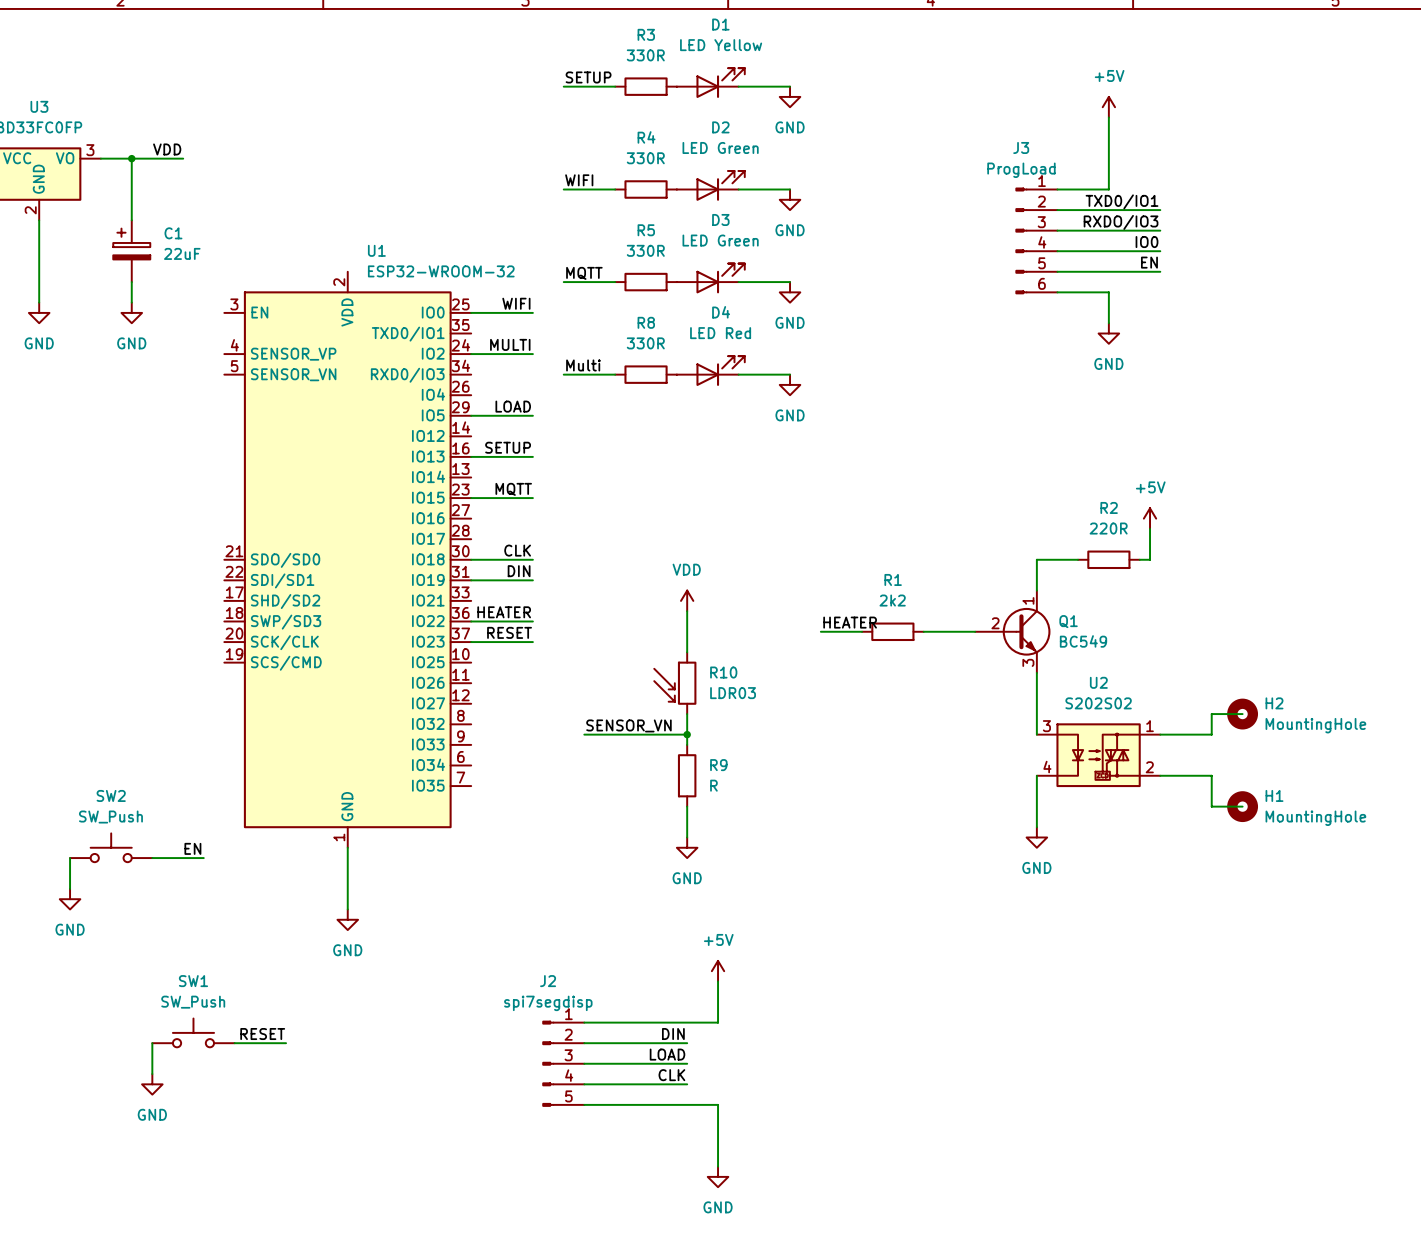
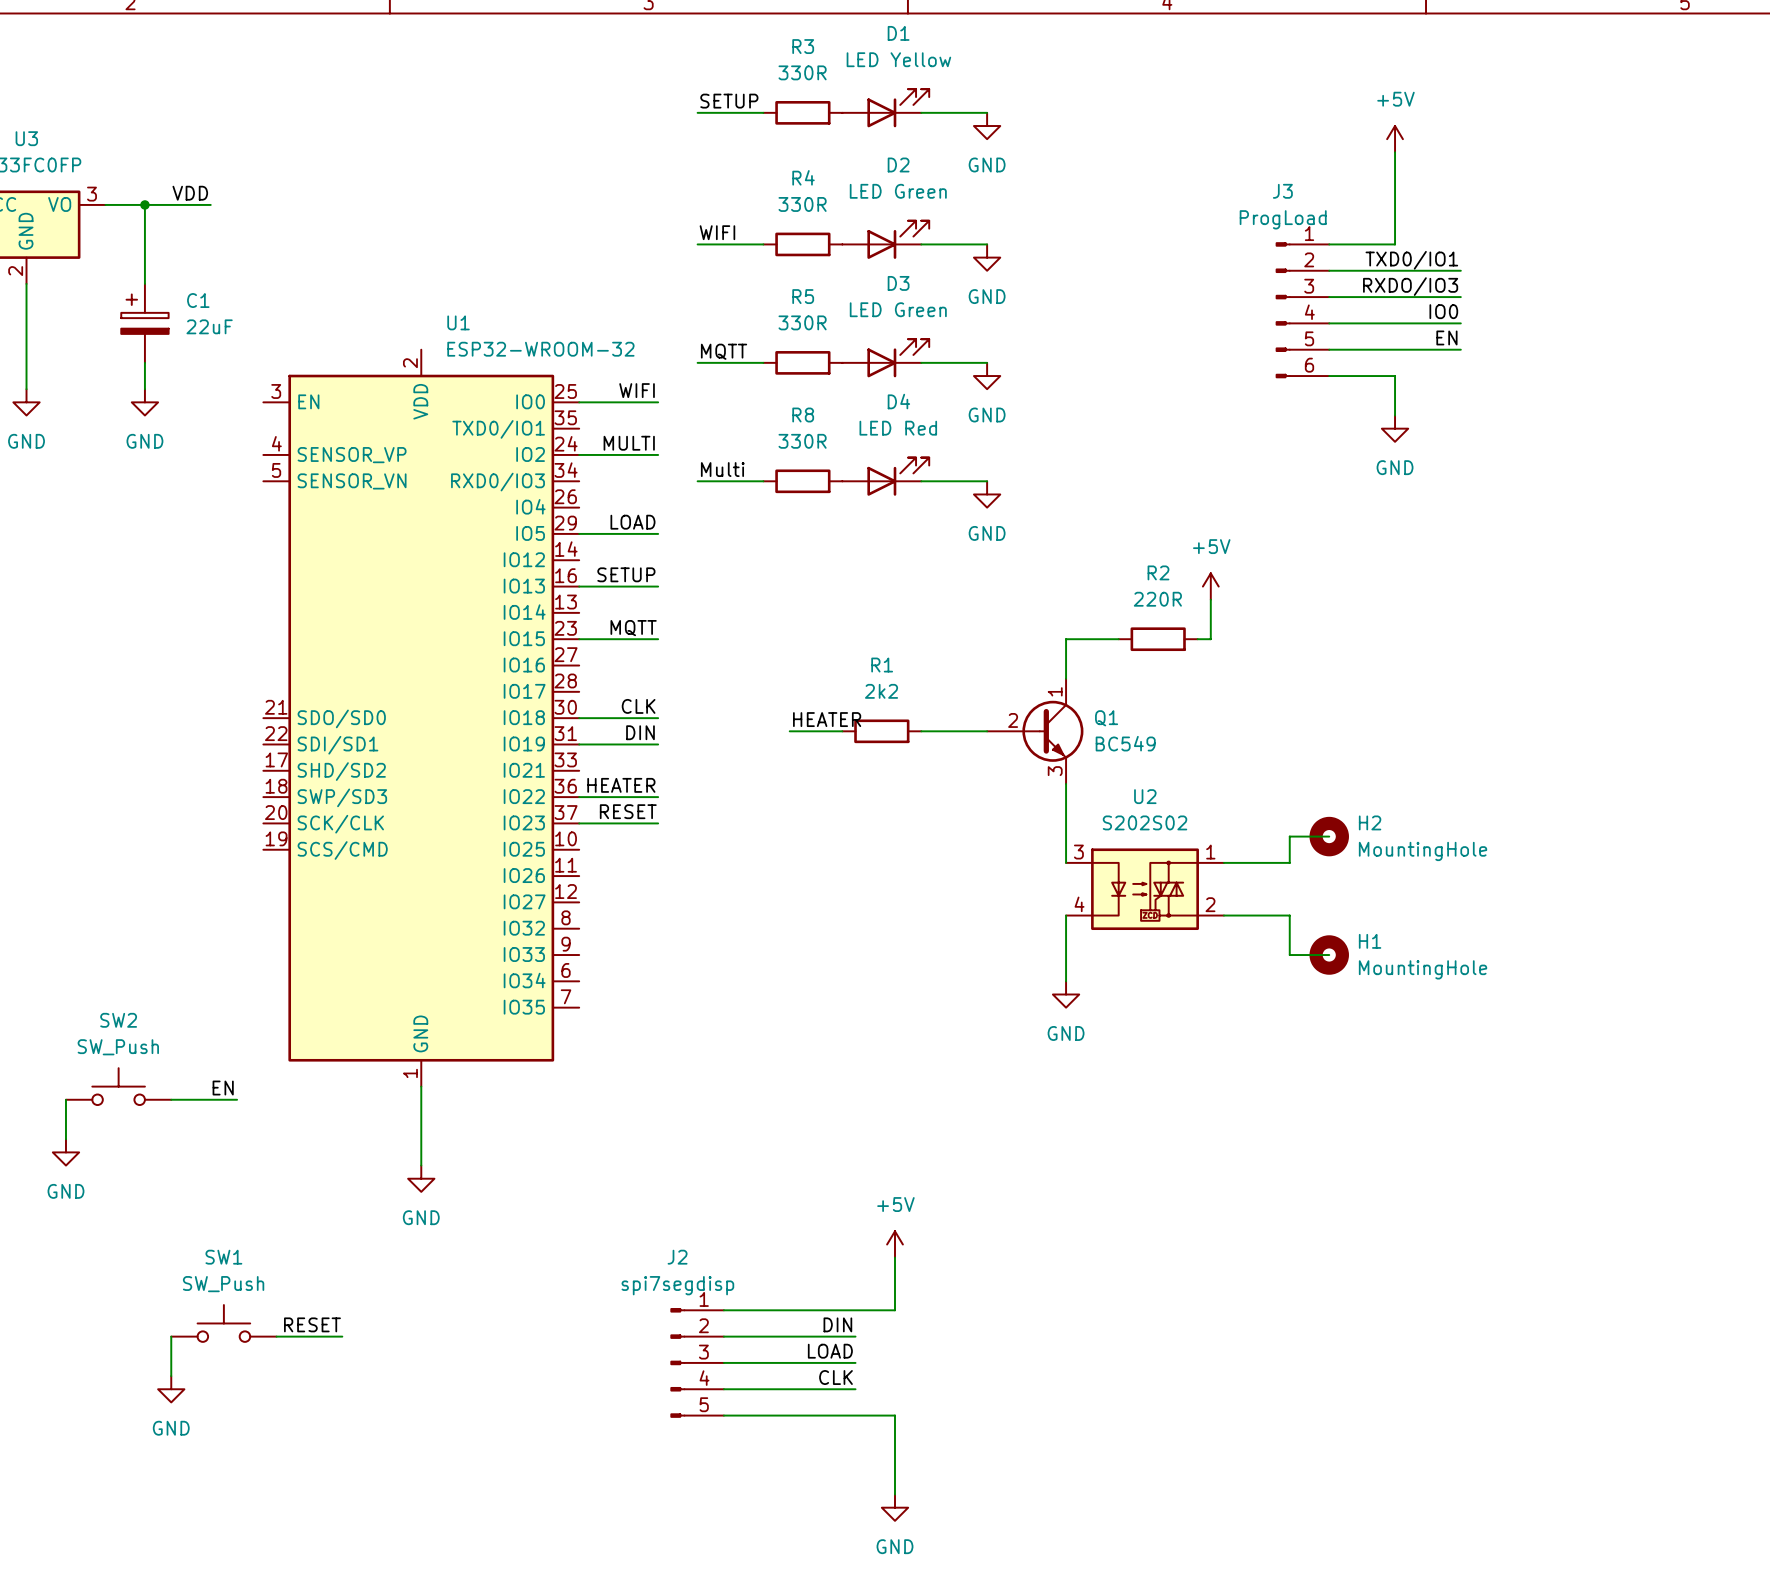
power symbol position: +5V (1150, 518) -> +5V (1210, 586)
wire: (1150, 528) (1150, 559) (1139, 559) -> (1210, 599) (1210, 639) (1197, 639)
wire: (1078, 559) (1036, 559) (1036, 590) -> (1118, 639) (1066, 639) (1066, 678)
R2 position: (1108, 559) -> (1158, 639)
power symbol: VDD (687, 600) -> none
wire: (687, 611) (687, 652) -> none
label position: HEATER (850, 622) -> HEATER (827, 719)
wire: (820, 631) (862, 631) -> (789, 731) (842, 731)
R1 position: (892, 631) -> (881, 731)
wire: (923, 631) (975, 631) -> (921, 731) (987, 731)
Q1 position: (1012, 631) -> (1035, 731)
wire: (1036, 672) (1036, 734) -> (1066, 783) (1066, 862)
R10: LDR03 (675, 683) -> none
wire: (687, 714) (687, 744) -> none
wire: (1242, 714) (1211, 714) (1211, 734) (1160, 734) -> (1329, 836) (1289, 836) (1289, 862) (1223, 862)
H2 position: (1242, 714) -> (1329, 836)
label: SENSOR_VN (628, 725) -> none
wire: (584, 734) (687, 734) -> none
junction: (687, 734) -> none
U2 position: (1098, 755) -> (1145, 889)
R9: R (687, 775) -> none
power symbol: none -> GND (1066, 994)
wire: (1036, 775) (1036, 827) -> (1066, 915) (1066, 981)
wire: (1160, 775) (1211, 775) (1211, 806) (1242, 806) -> (1223, 915) (1289, 915) (1289, 955) (1329, 955)
wire: (687, 806) (687, 837) -> none
H1 position: (1242, 806) -> (1329, 955)
power symbol: GND (1036, 837) -> none
power symbol: GND (687, 847) -> none

